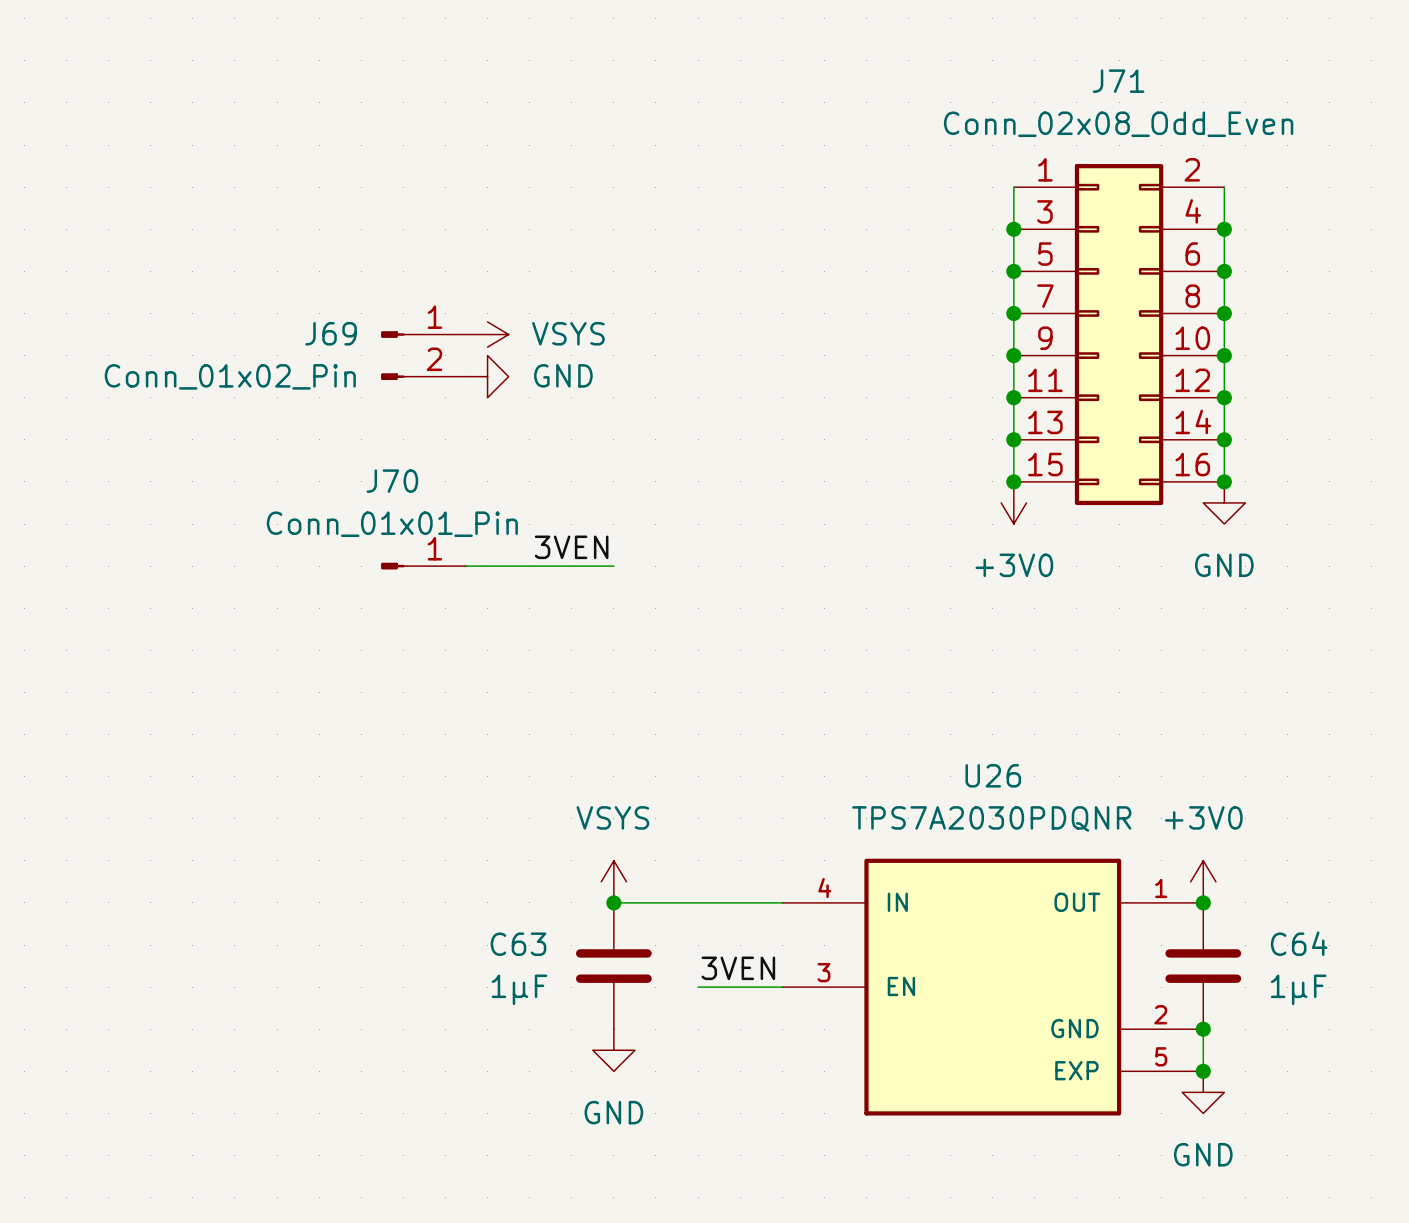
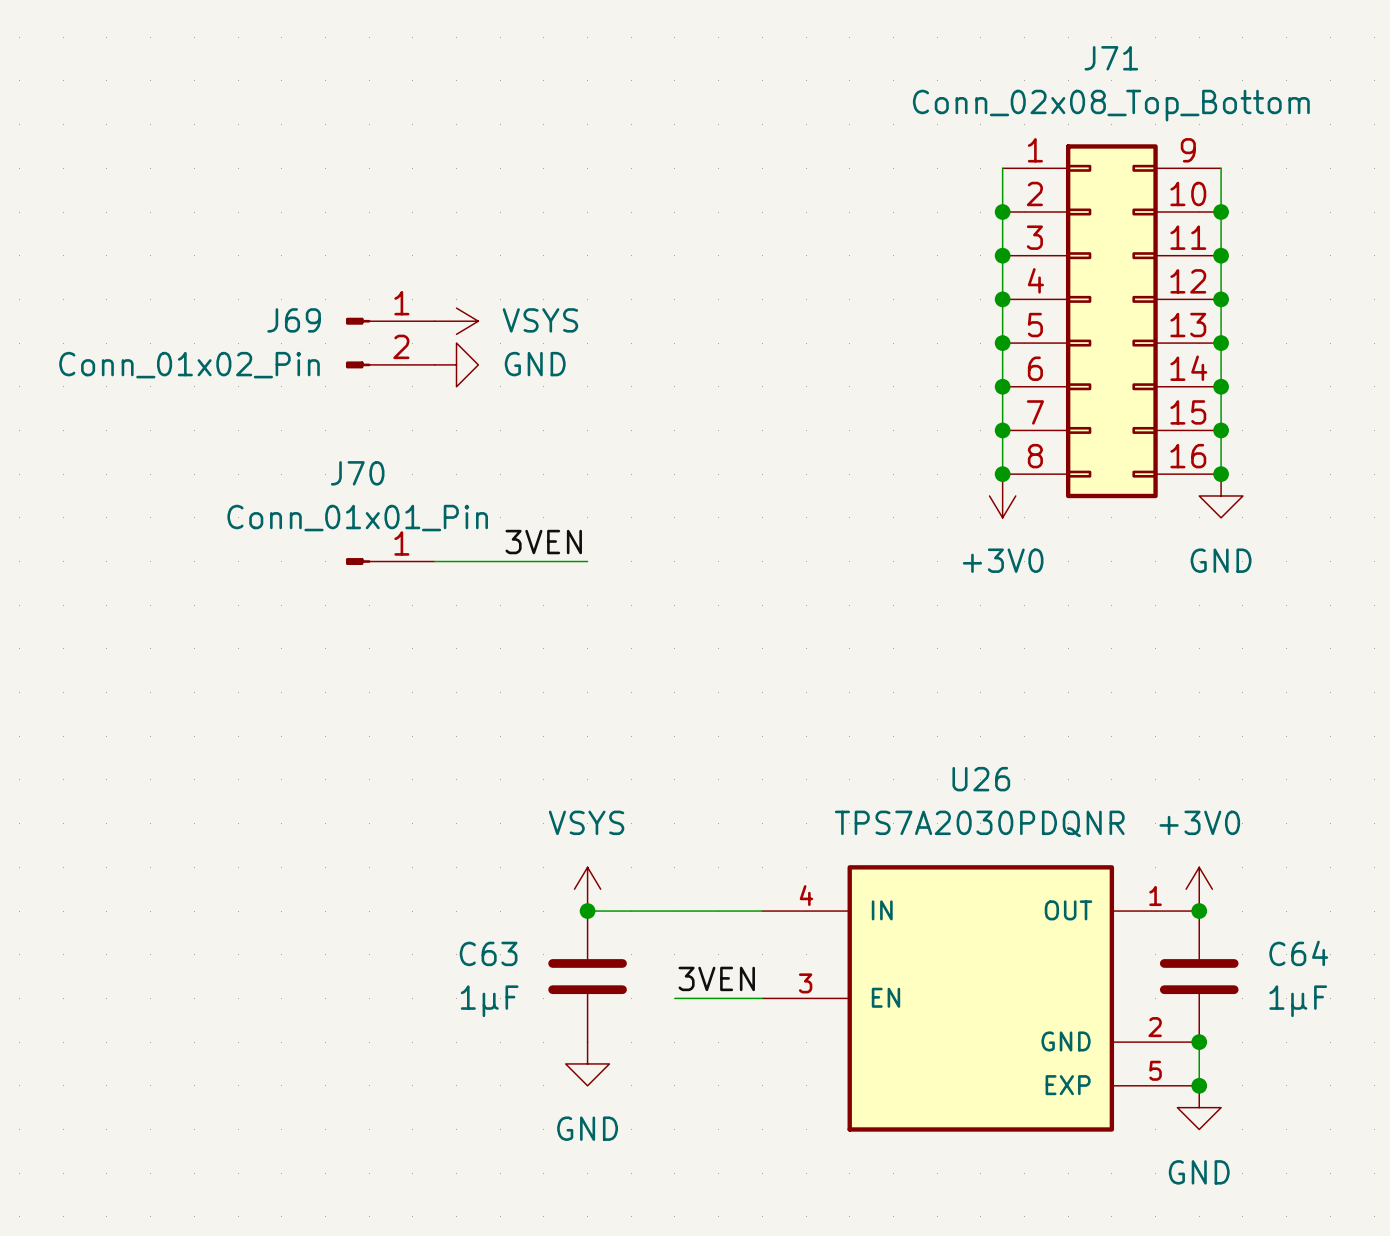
J71 value: Conn_02x08_Odd_Even (1118, 124) -> Conn_02x08_Top_Bottom (1111, 105)
J71 symbol: [1013, 164, 1225, 506] -> [1002, 144, 1222, 499]

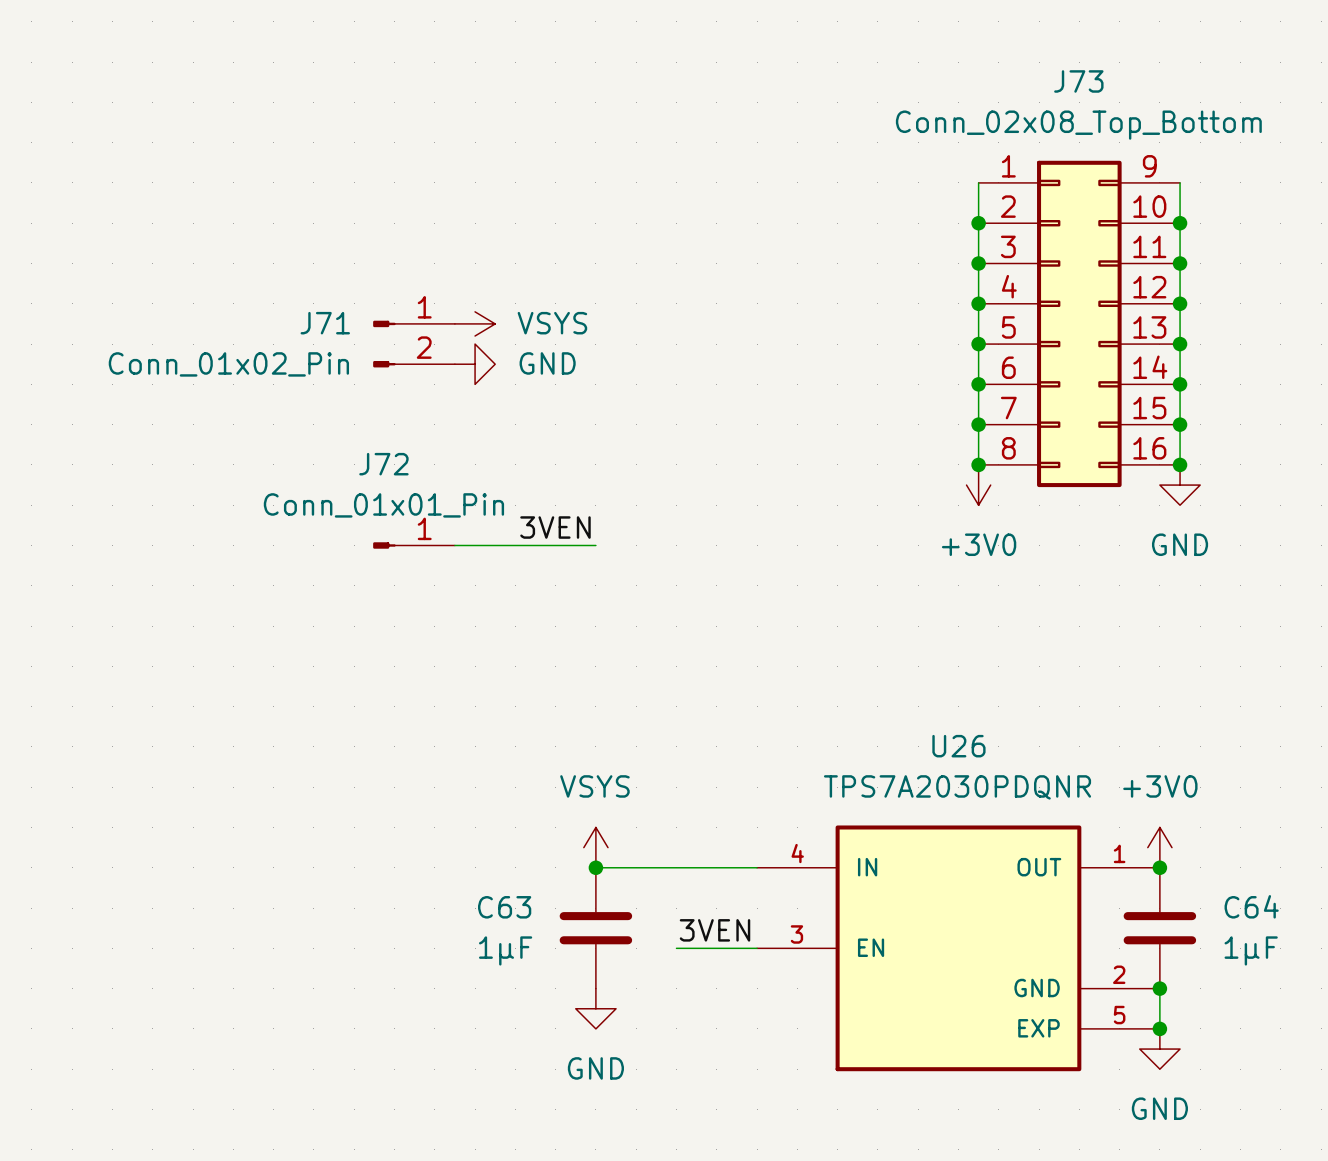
J71 name: J71 (1111, 58) -> J73 (1078, 81)
J69 name: J69 (294, 320) -> J71 (325, 323)
J70 name: J70 (357, 473) -> J72 (383, 464)

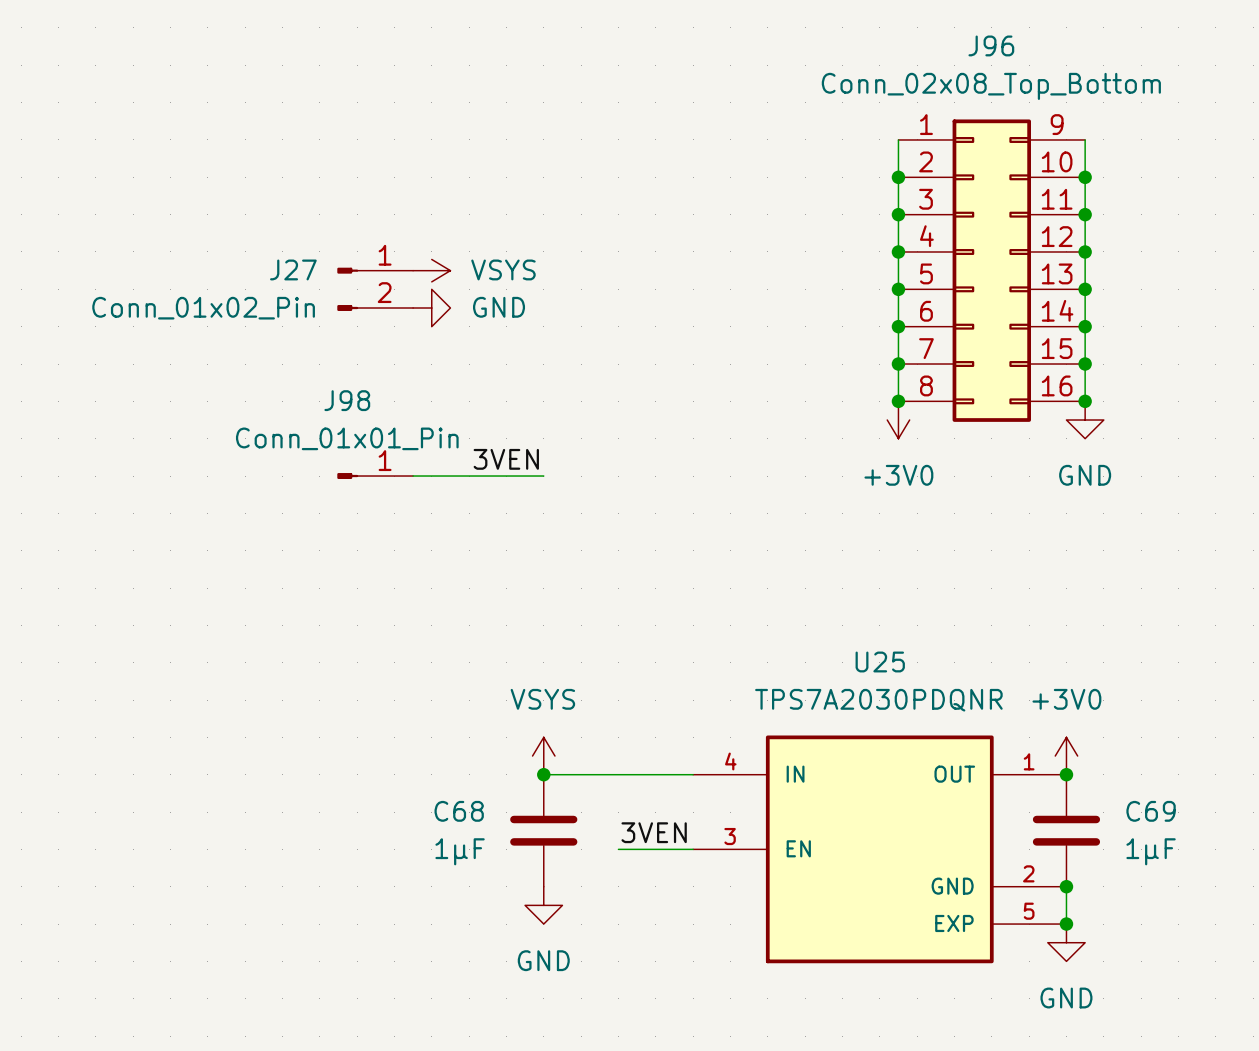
J73 name: J73 (1078, 81) -> J96 (991, 45)
J71 name: J71 (325, 323) -> J27 (293, 269)
J72 name: J72 (383, 464) -> J98 (347, 400)
U26 name: U26 (958, 746) -> U25 (880, 661)
C64 name: C64 (1251, 906) -> C69 (1151, 811)
C63 name: C63 (504, 907) -> C68 (459, 811)

